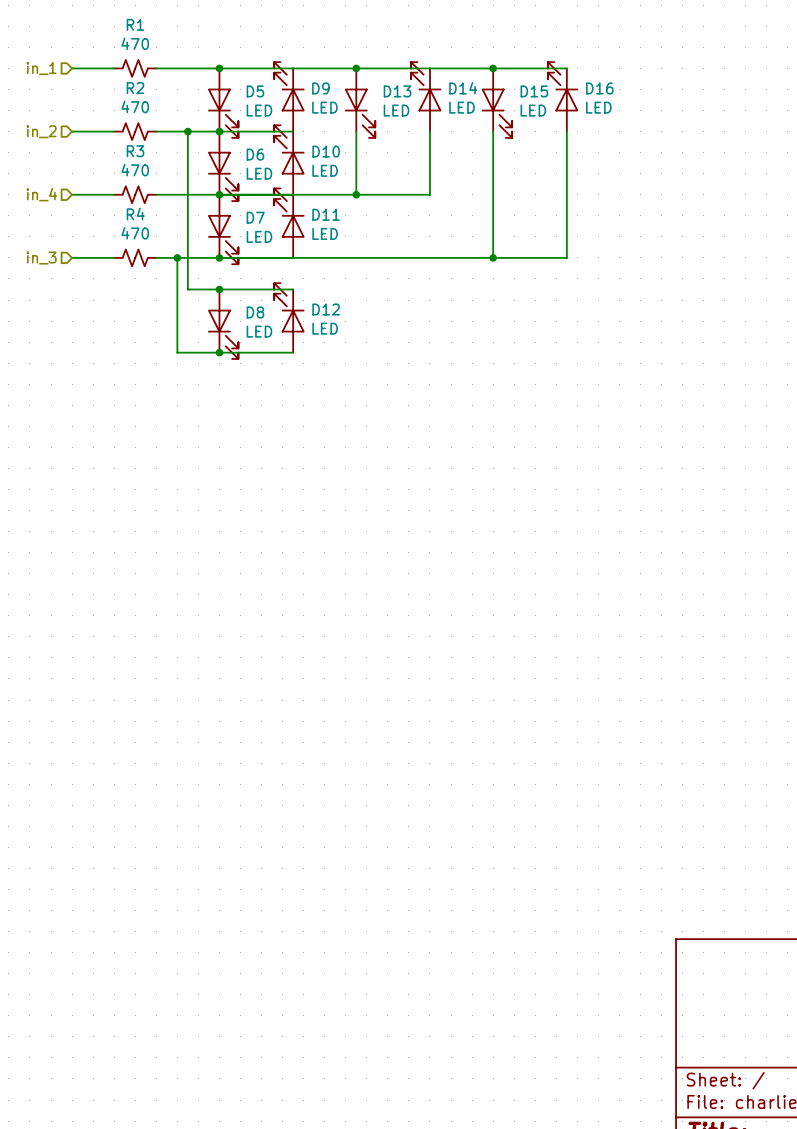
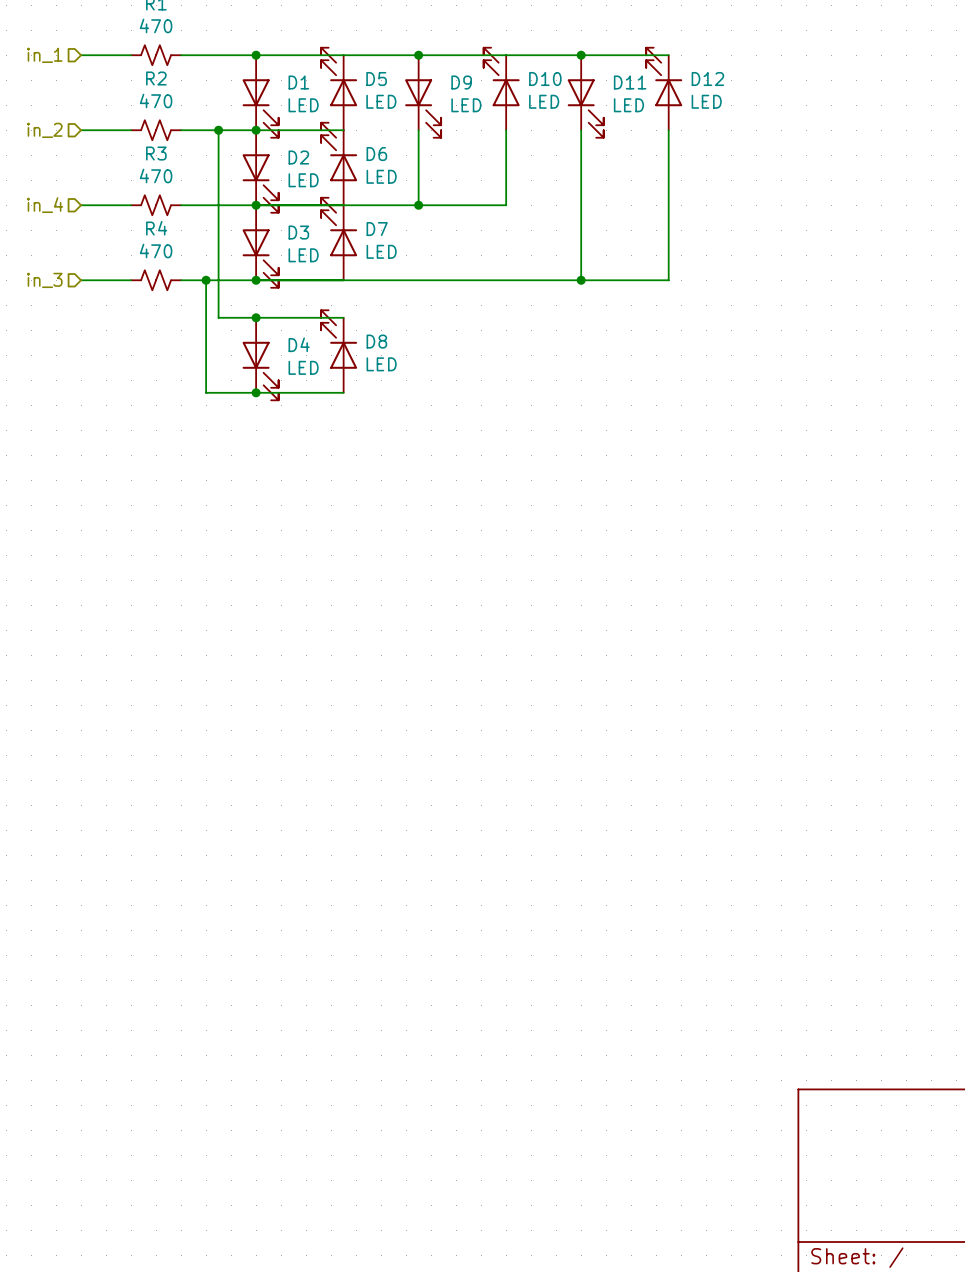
D9 name: D9 (320, 88) -> D5 (376, 79)
D14 name: D14 (463, 88) -> D10 (545, 79)
D16 name: D16 (599, 88) -> D12 (707, 79)
D5 name: D5 (255, 91) -> D1 (298, 82)
D13 name: D13 (397, 91) -> D9 (461, 82)
D15 name: D15 (534, 91) -> D11 (630, 82)
D10 name: D10 (326, 151) -> D6 (376, 154)
D6 name: D6 (255, 154) -> D2 (298, 157)
D11 name: D11 (326, 214) -> D7 (377, 229)
D7 name: D7 (255, 217) -> D3 (298, 232)
D12 name: D12 (326, 309) -> D8 (376, 341)
D8 name: D8 (255, 312) -> D4 (299, 344)

